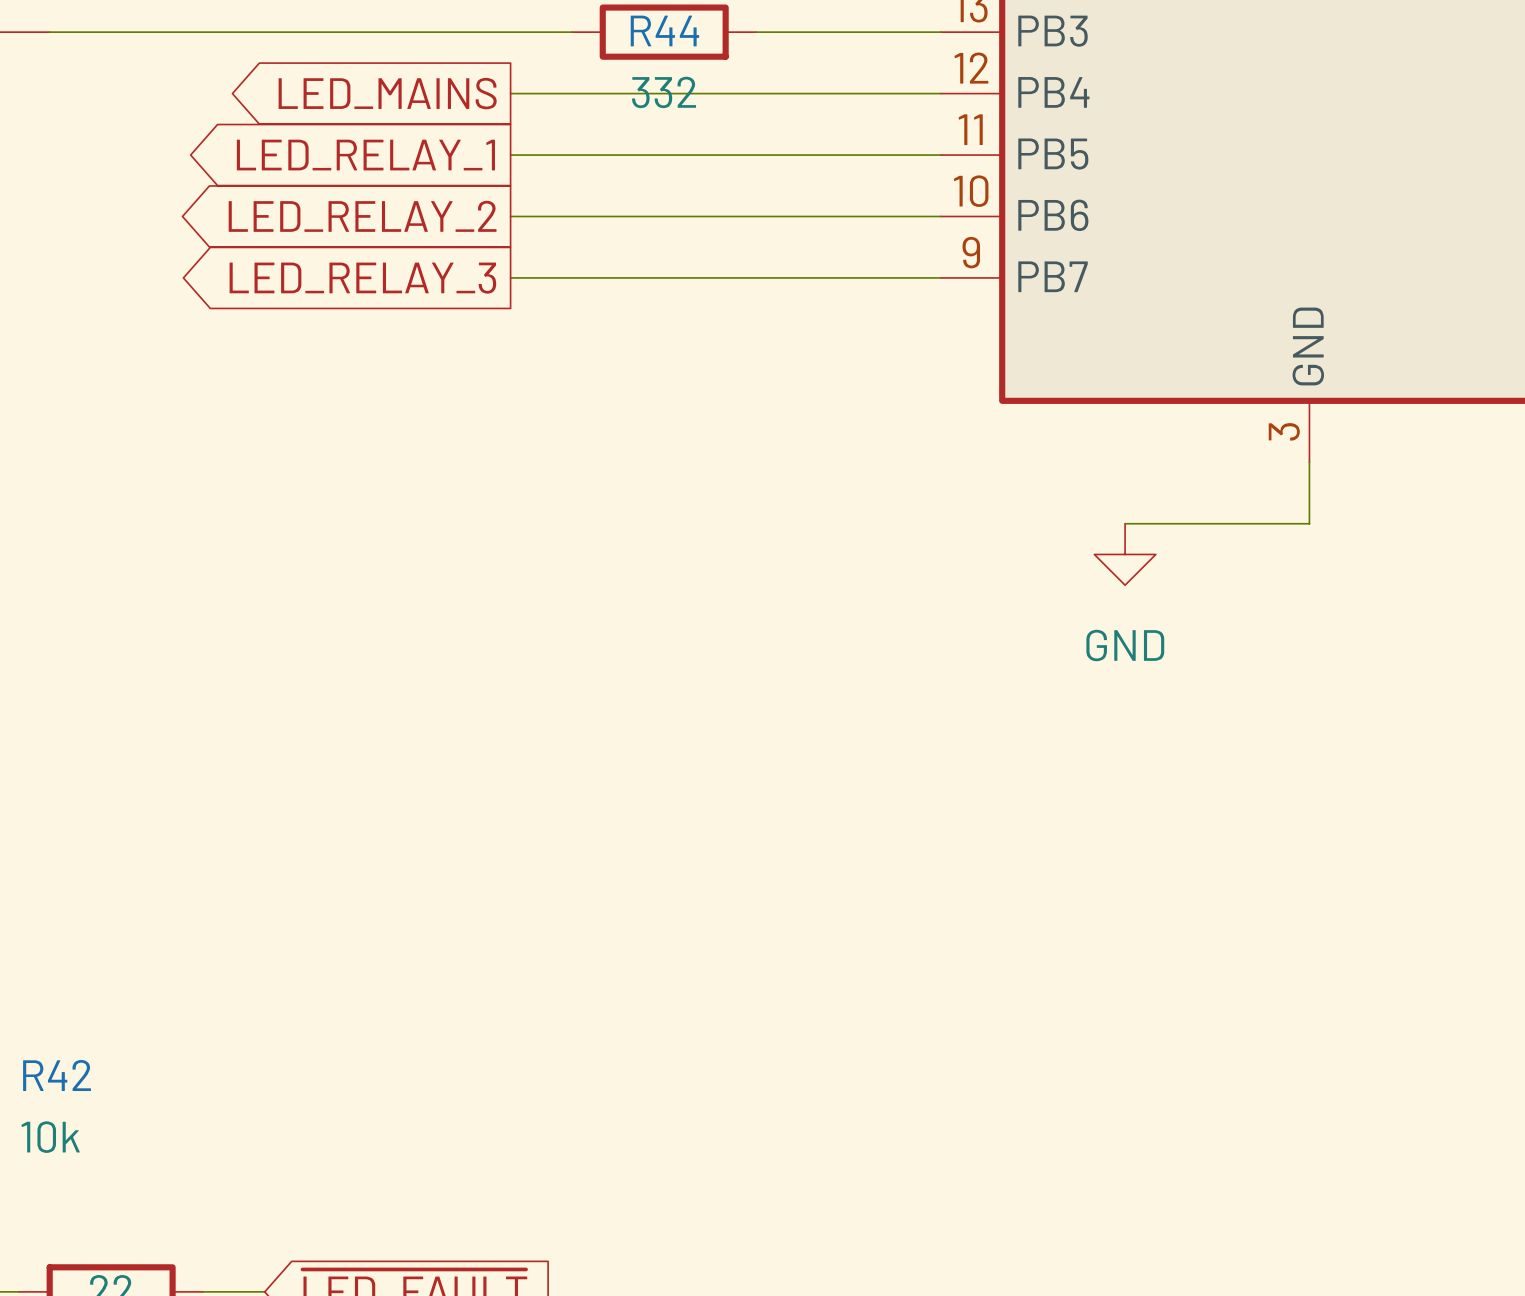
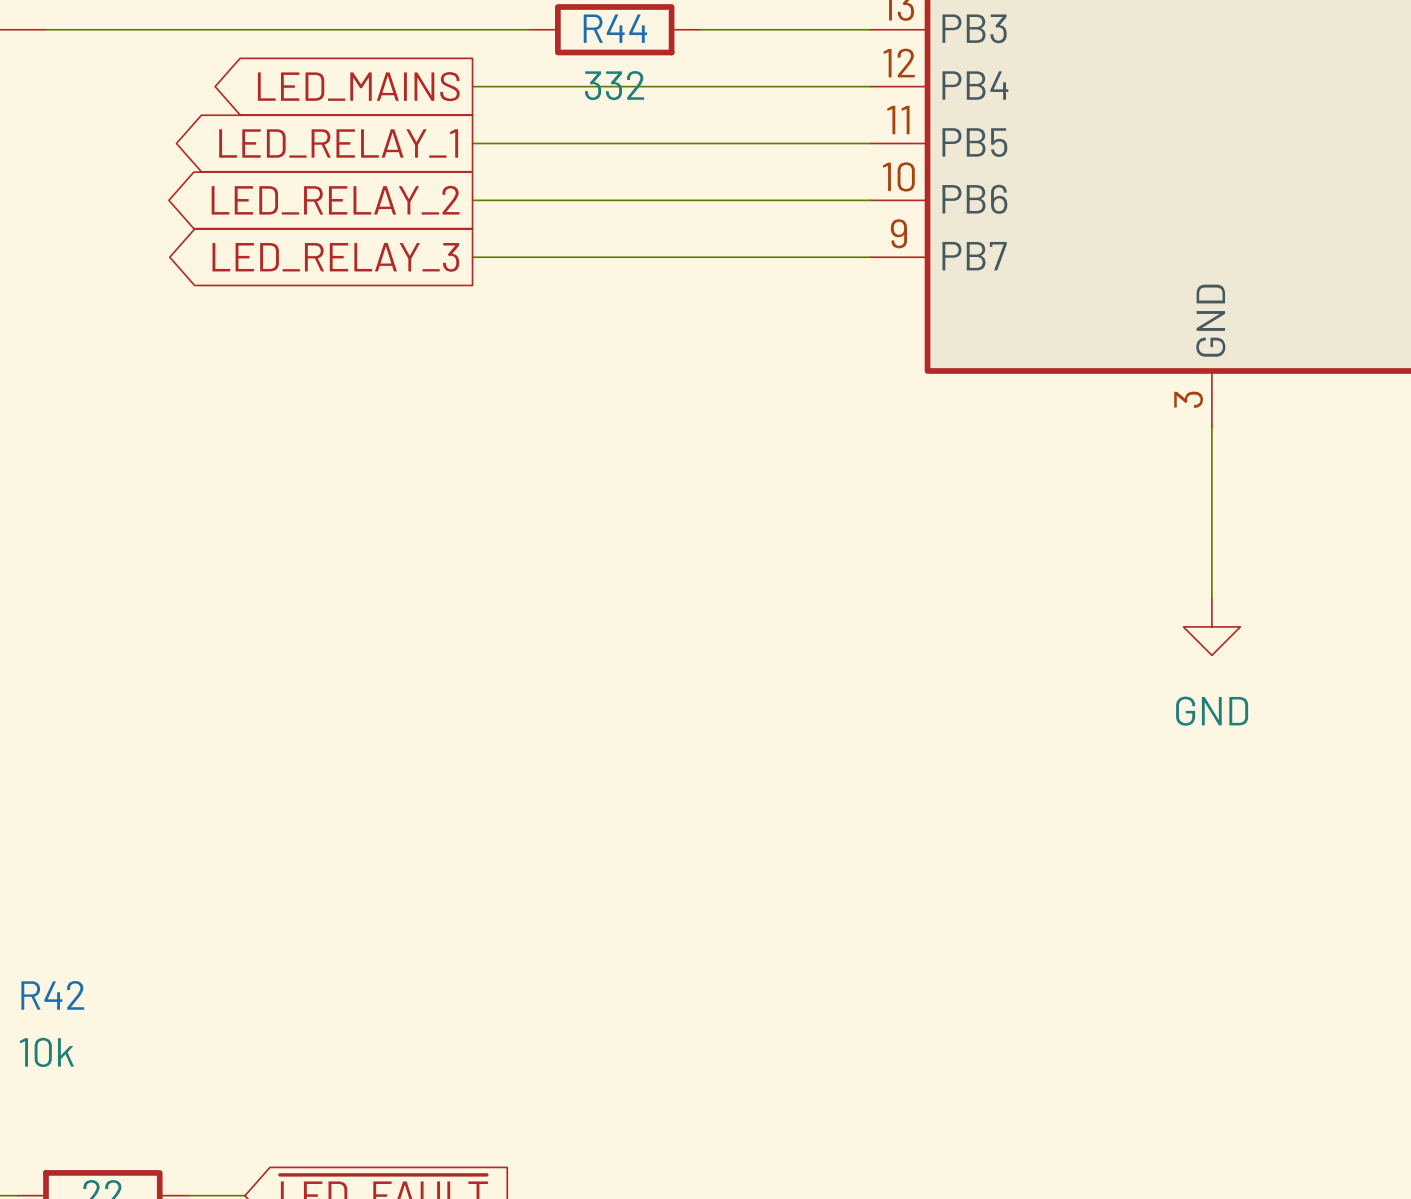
wire: (1125, 523) (1309, 523) -> (1211, 598) (1211, 484)
power symbol position: GND (1125, 554) -> GND (1211, 626)

